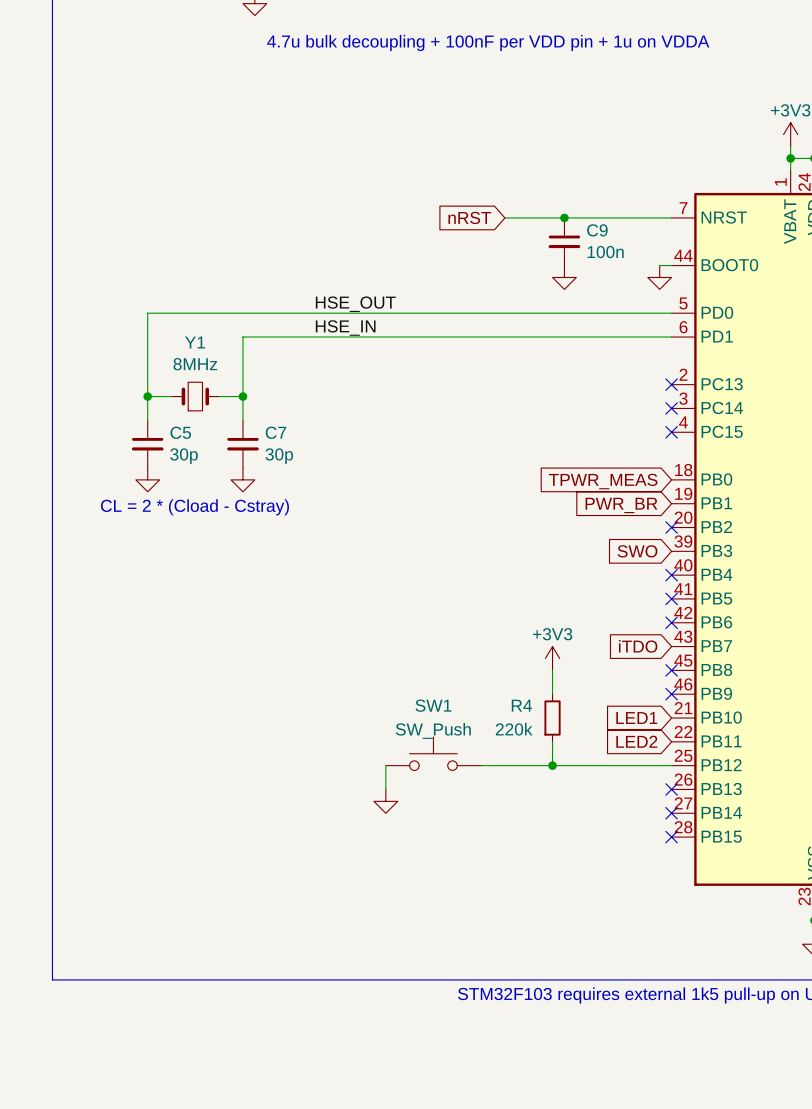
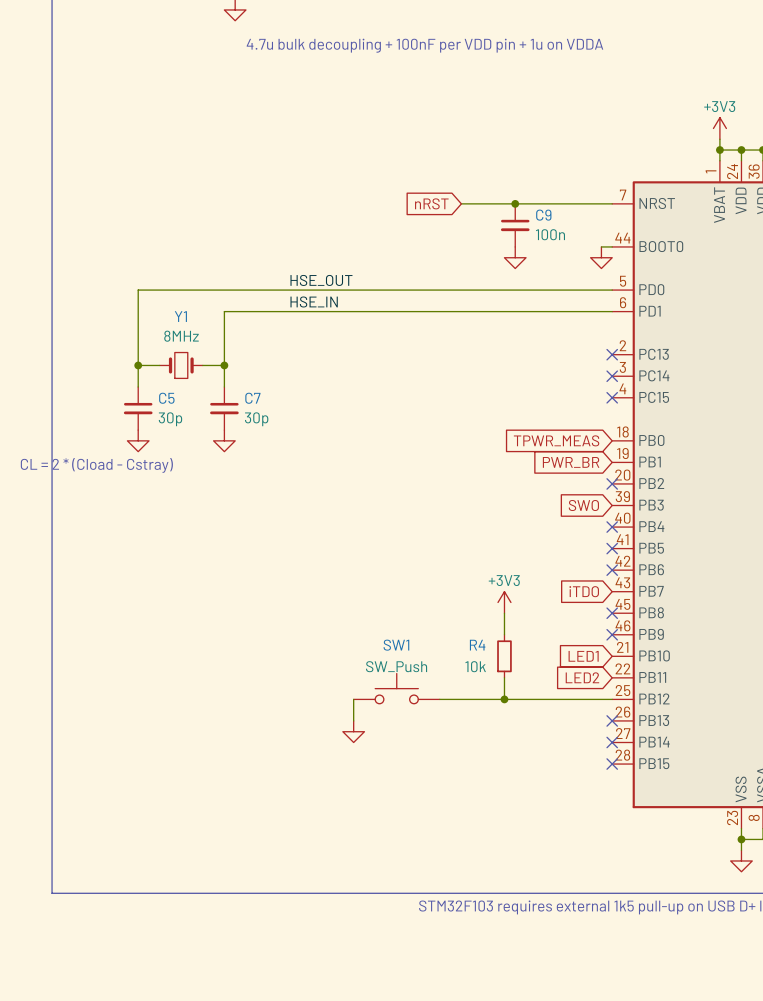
text position: CL = 2 * (Cload - Cstray) (194, 507) -> CL = 2 * (Cload - Cstray) (96, 465)
R4 value: 220k (514, 729) -> 10k (475, 666)

